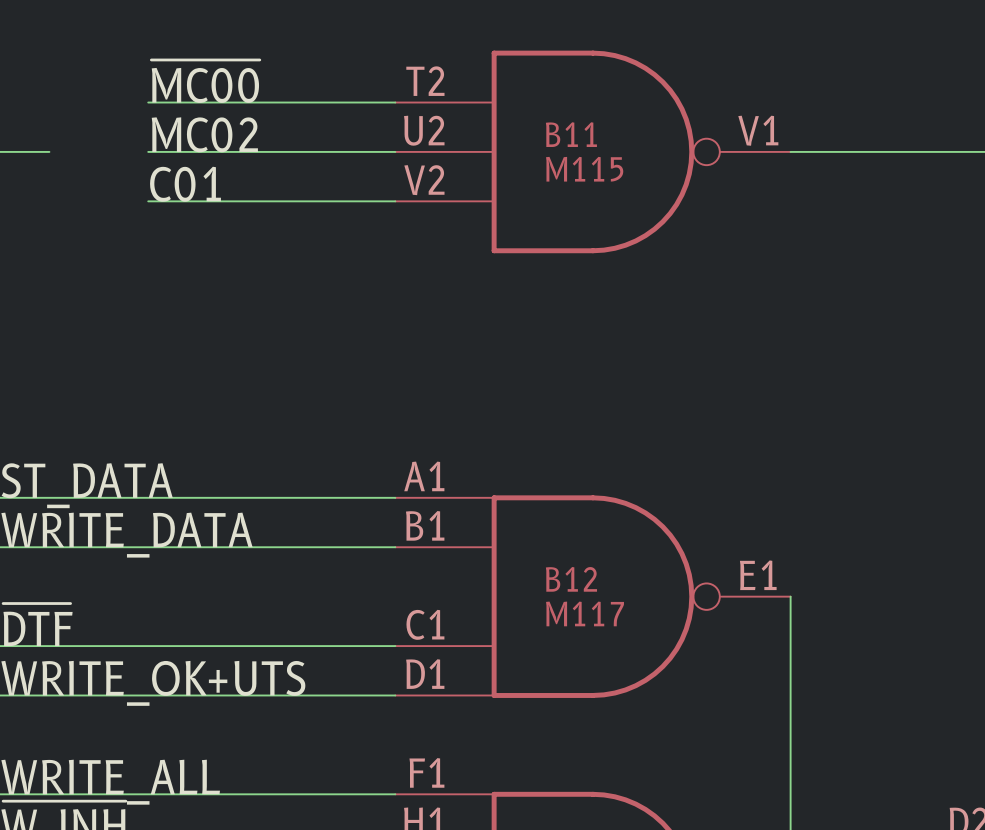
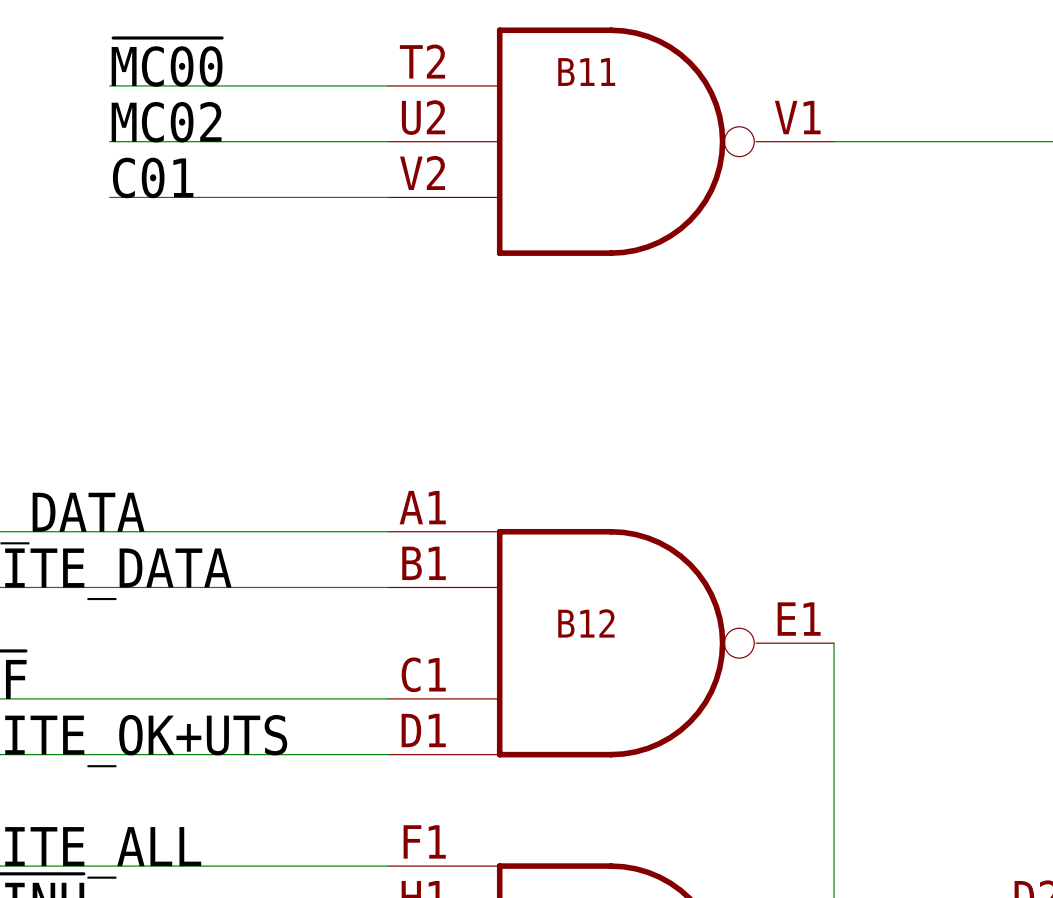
B11 name position: B11 (571, 134) -> B11 (586, 72)
B11 value: M115 (584, 169) -> none
B12 value: M117 (585, 613) -> none

